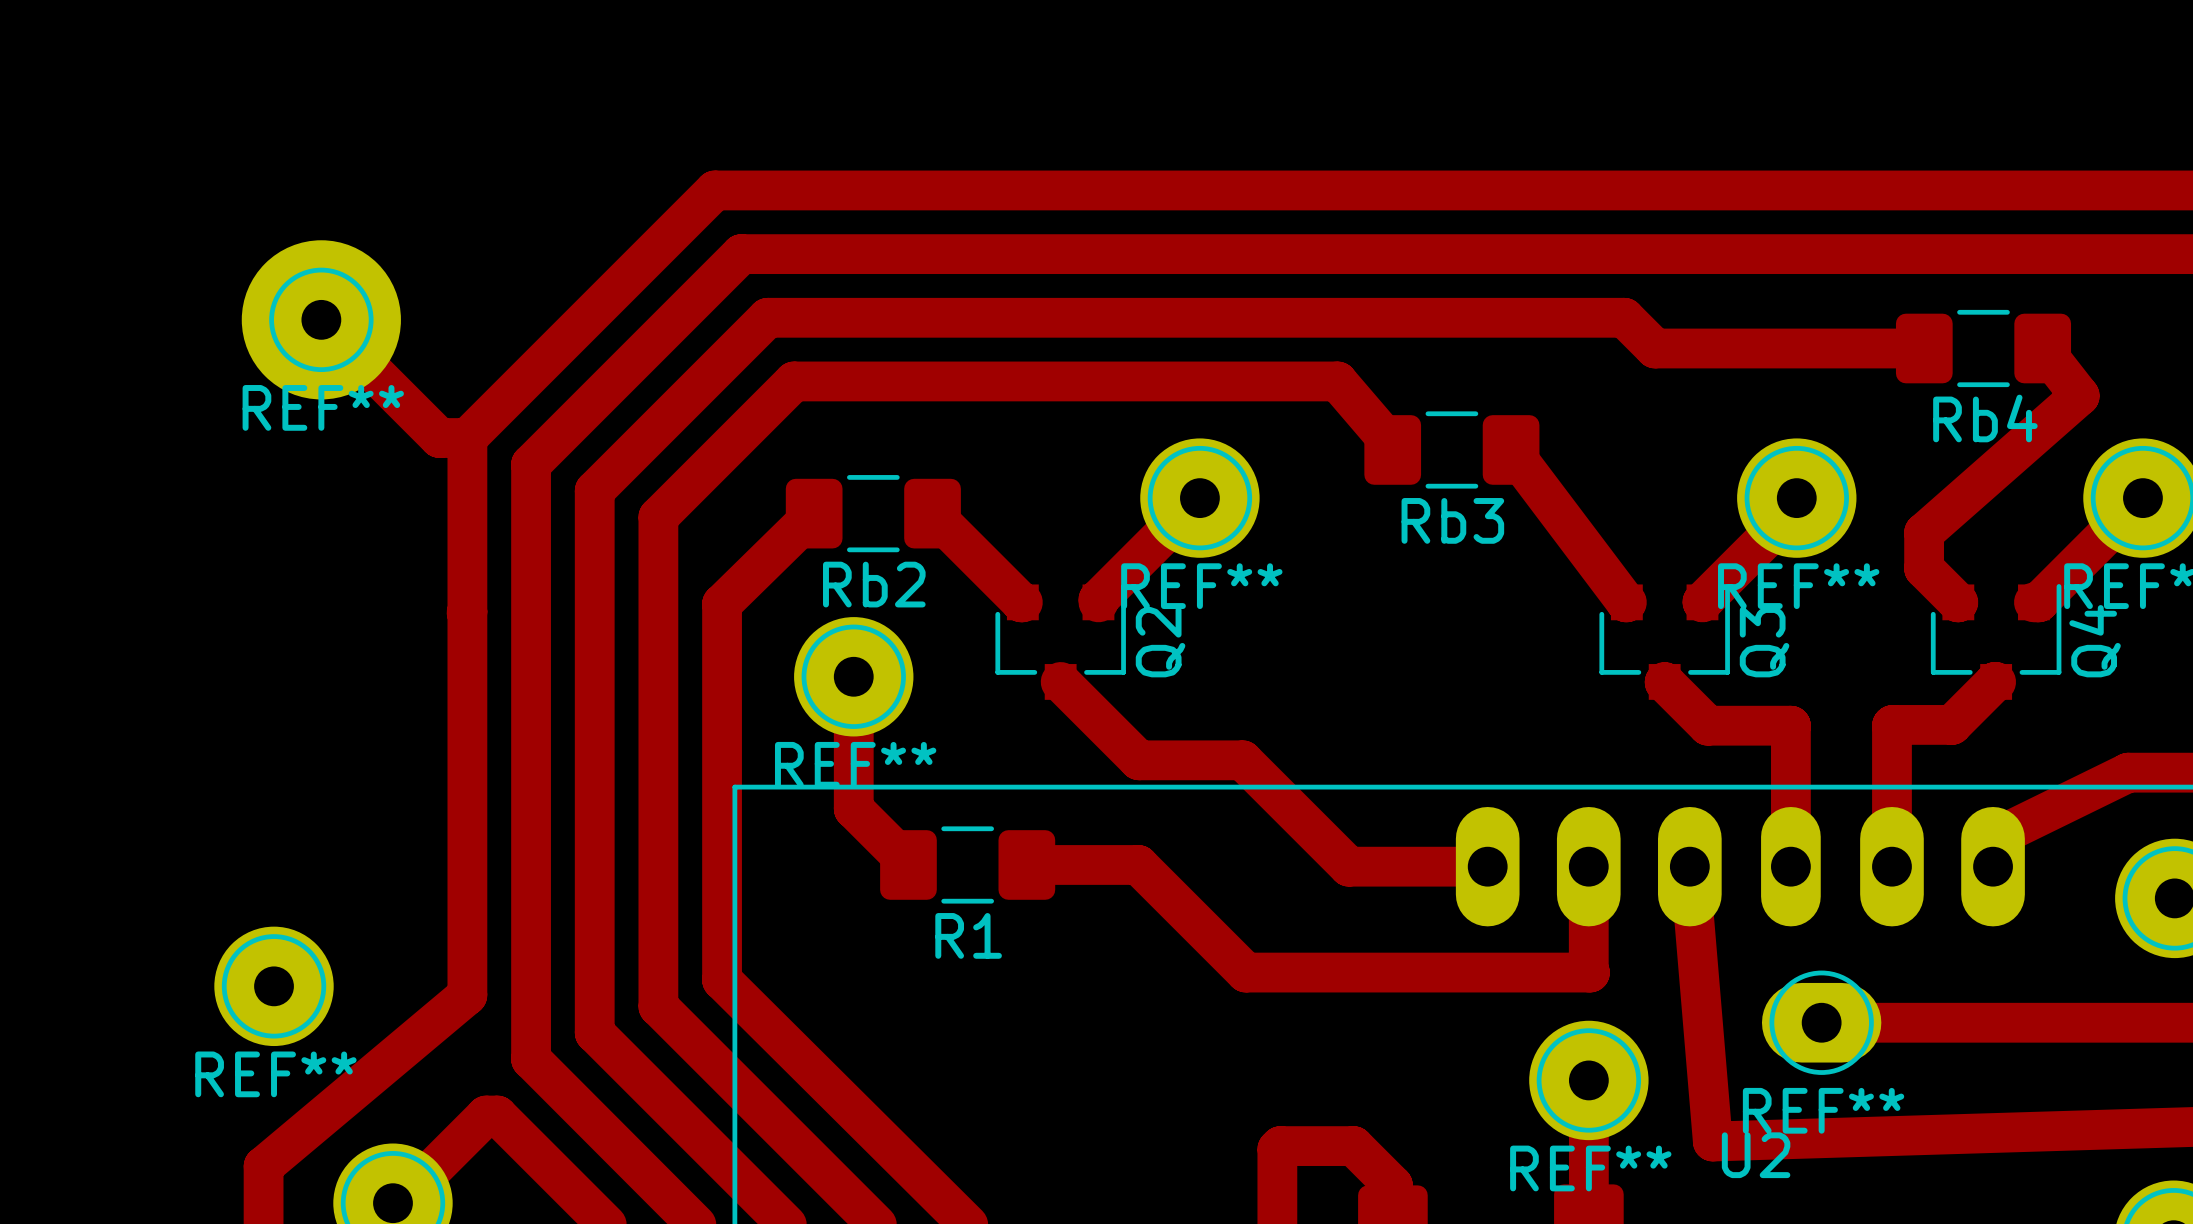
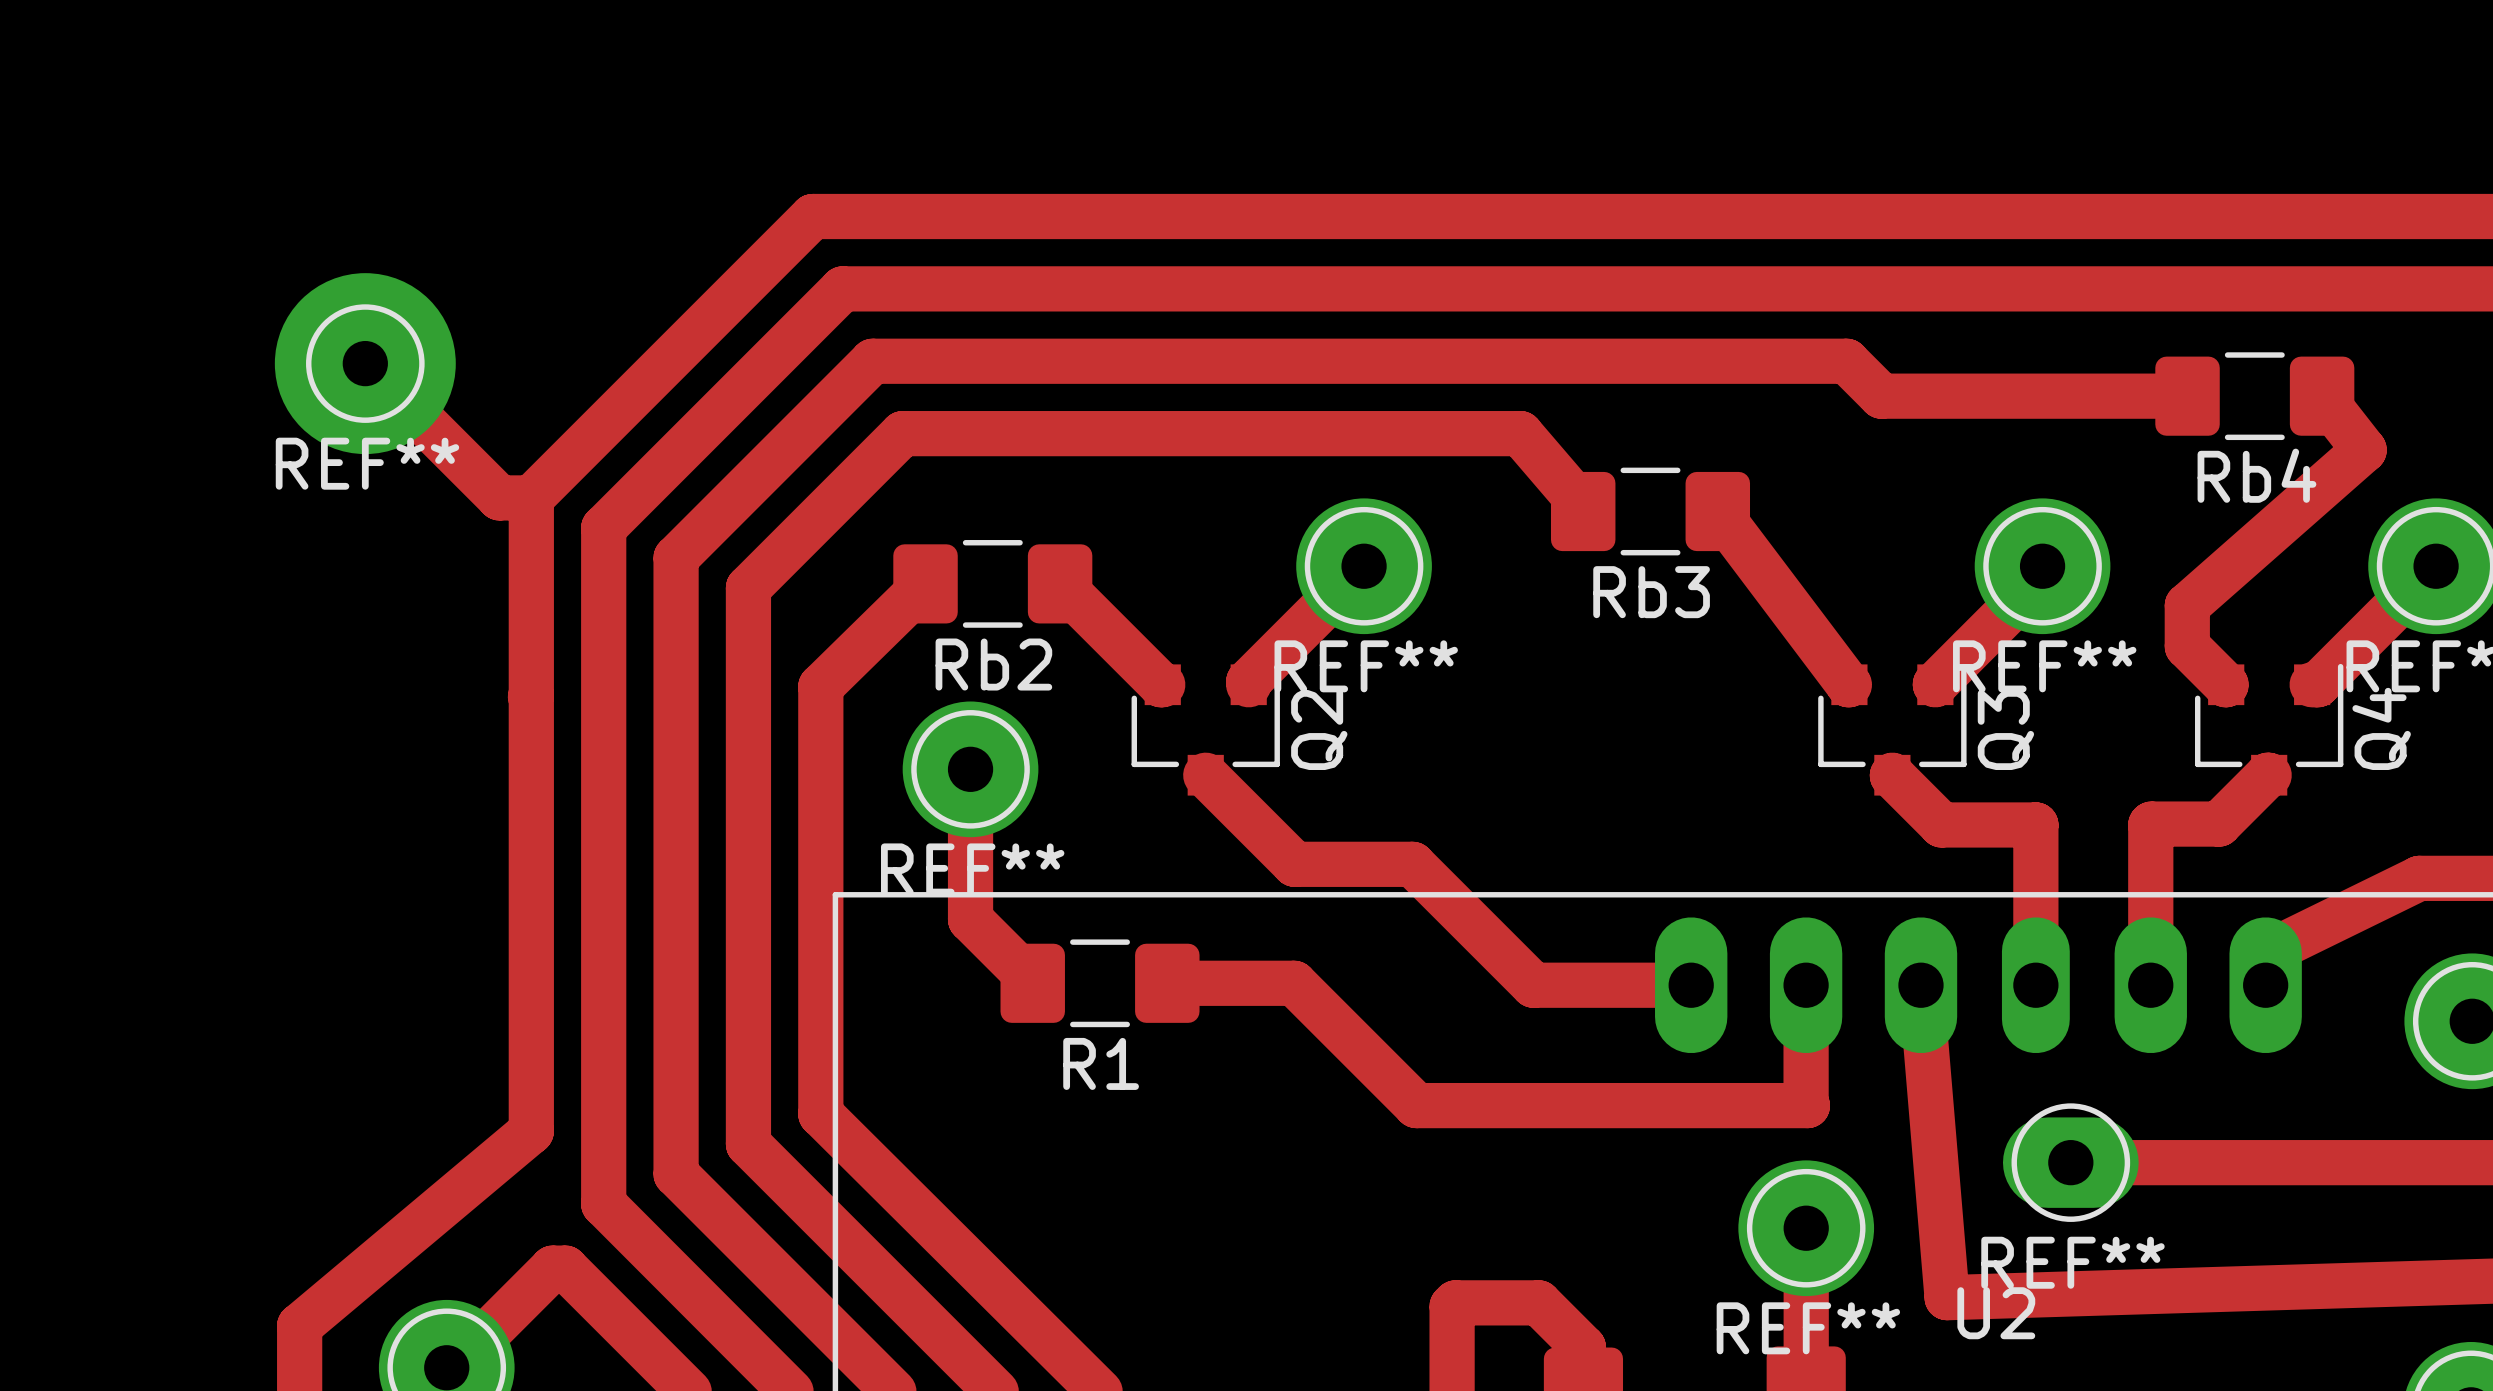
REF**: (274, 986) -> none

